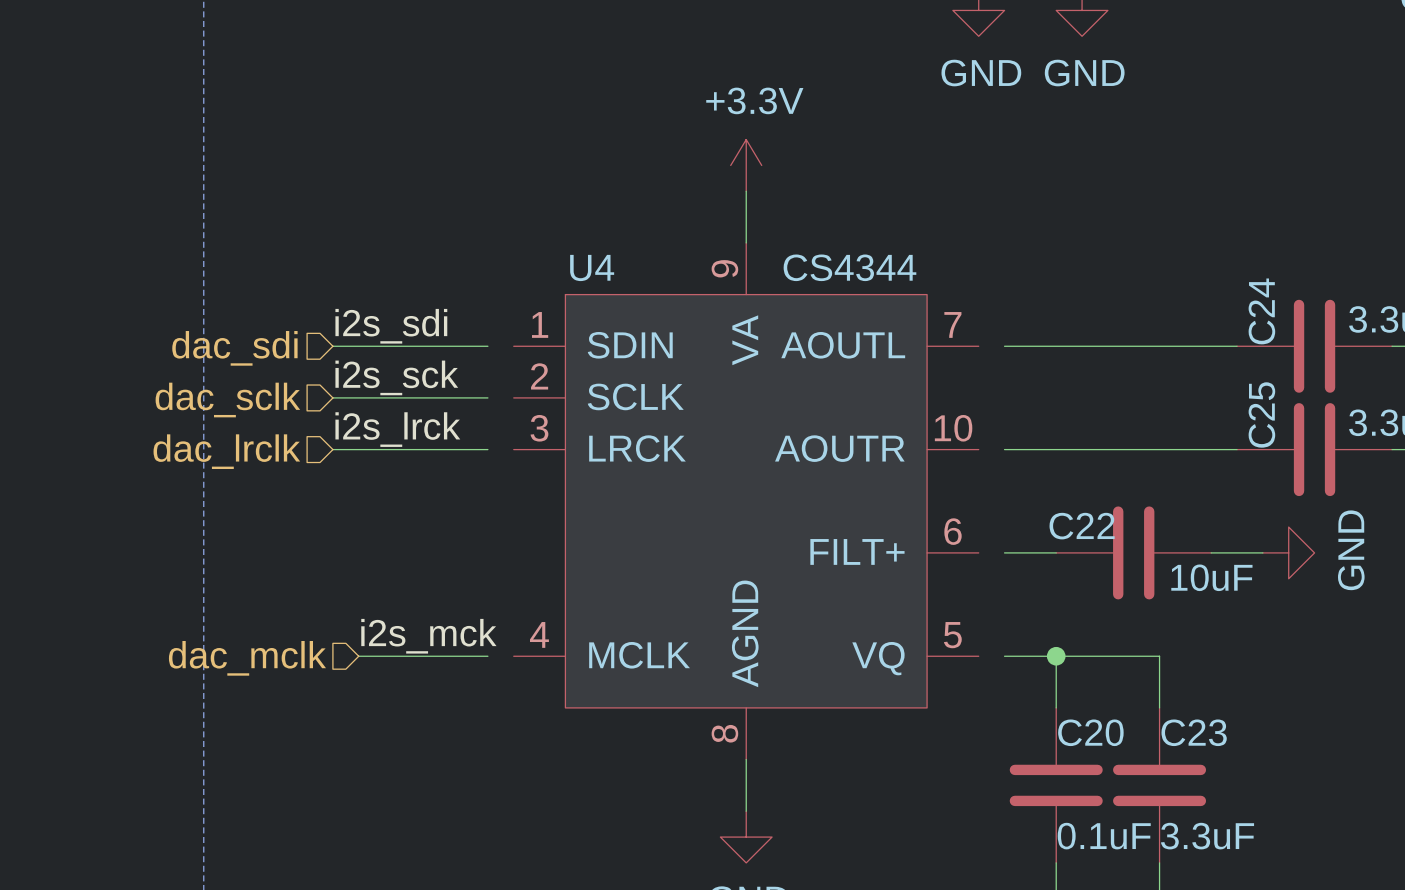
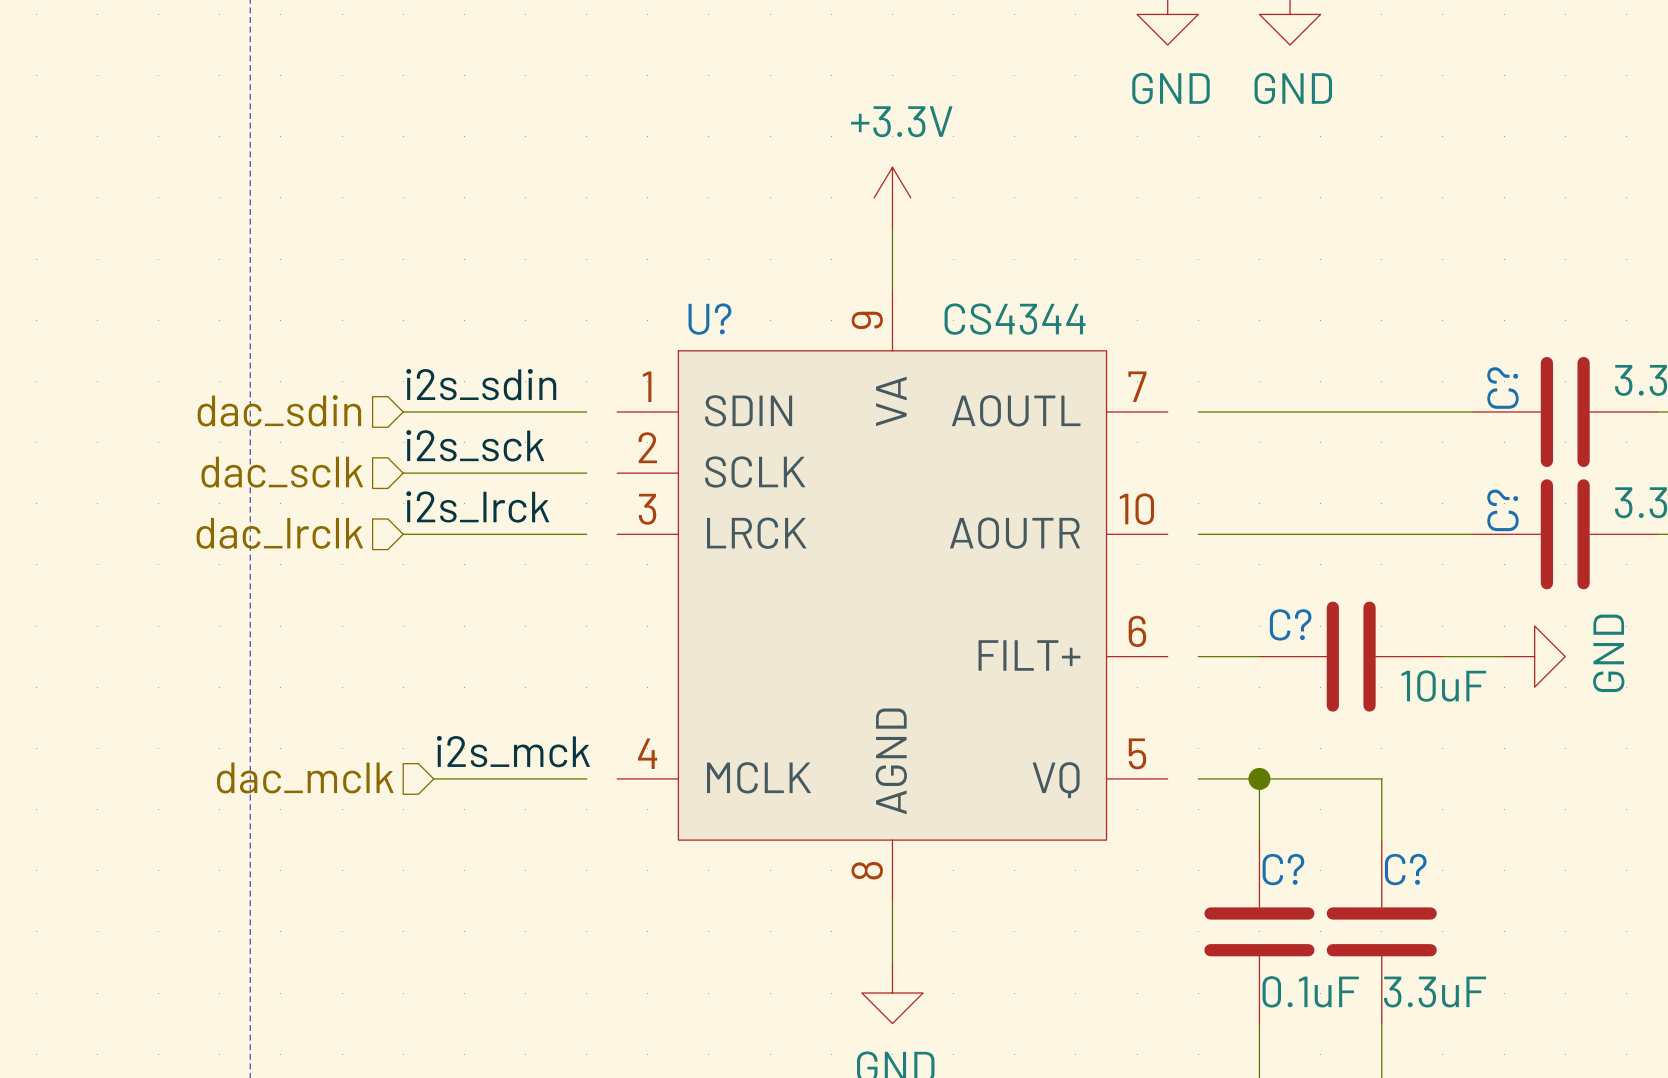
U4 name: U4 (592, 267) -> U? (709, 319)
C24 name: C24 (1261, 311) -> C? (1502, 388)
label: i2s_sdi (391, 326) -> i2s_sdin (481, 384)
hierarchical label: dac_sdi (234, 348) -> dac_sdin (279, 410)
C25 name: C25 (1261, 414) -> C? (1502, 510)
C22 name: C22 (1082, 526) -> C? (1290, 624)
C20 name: C20 (1090, 732) -> C? (1283, 869)
C23 name: C23 (1194, 732) -> C? (1405, 869)

